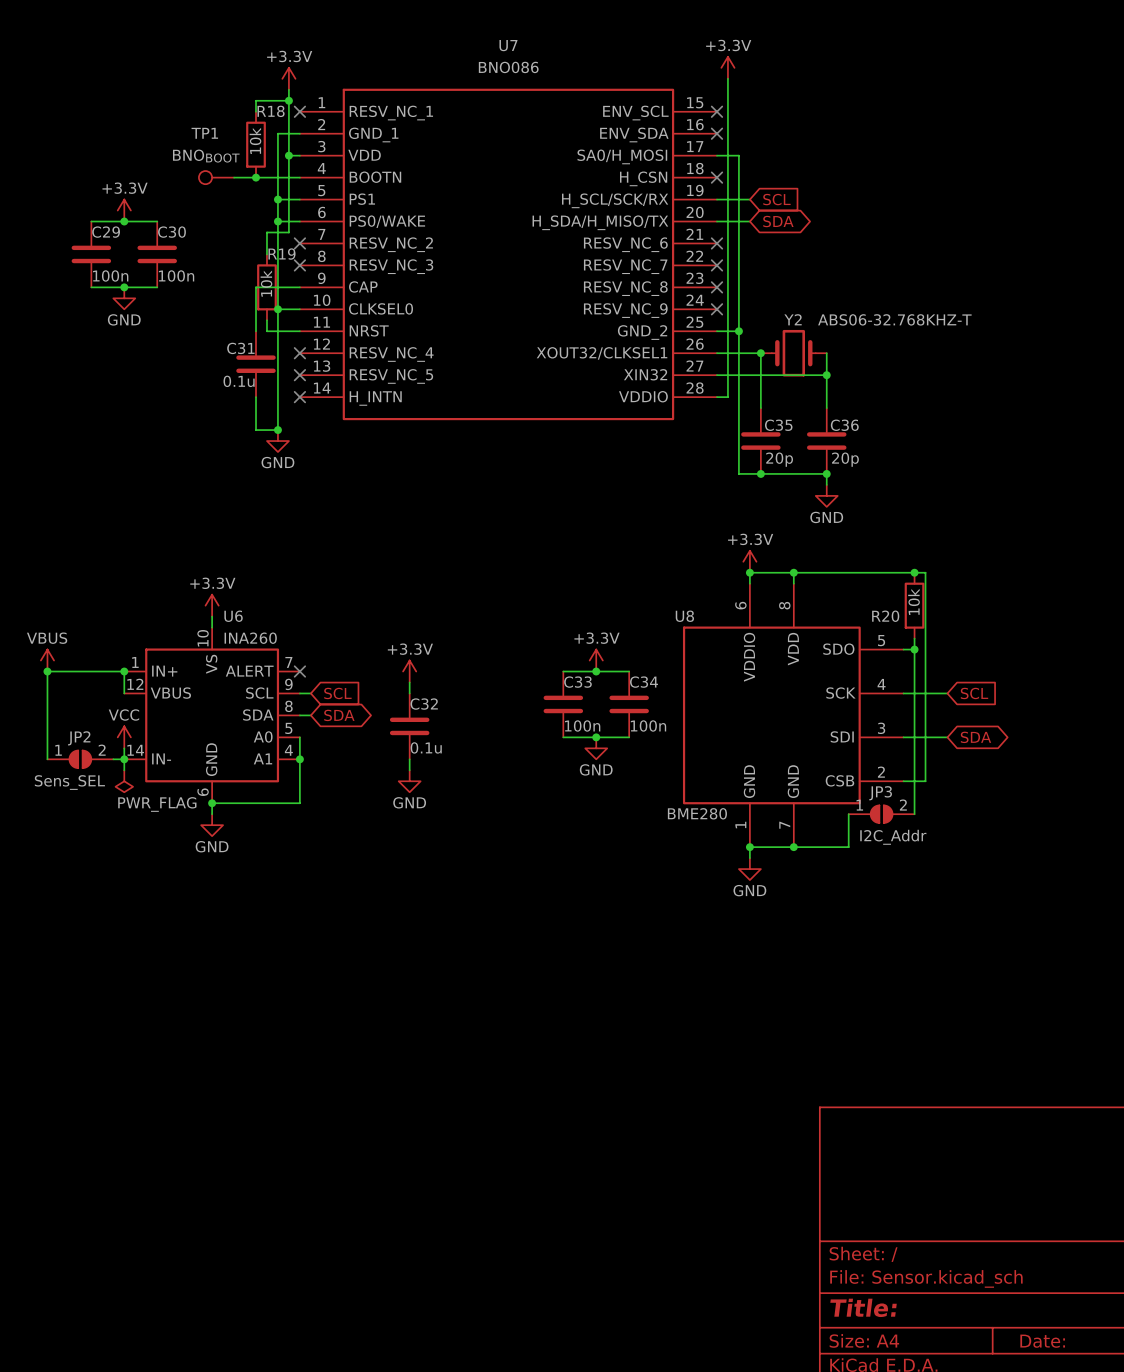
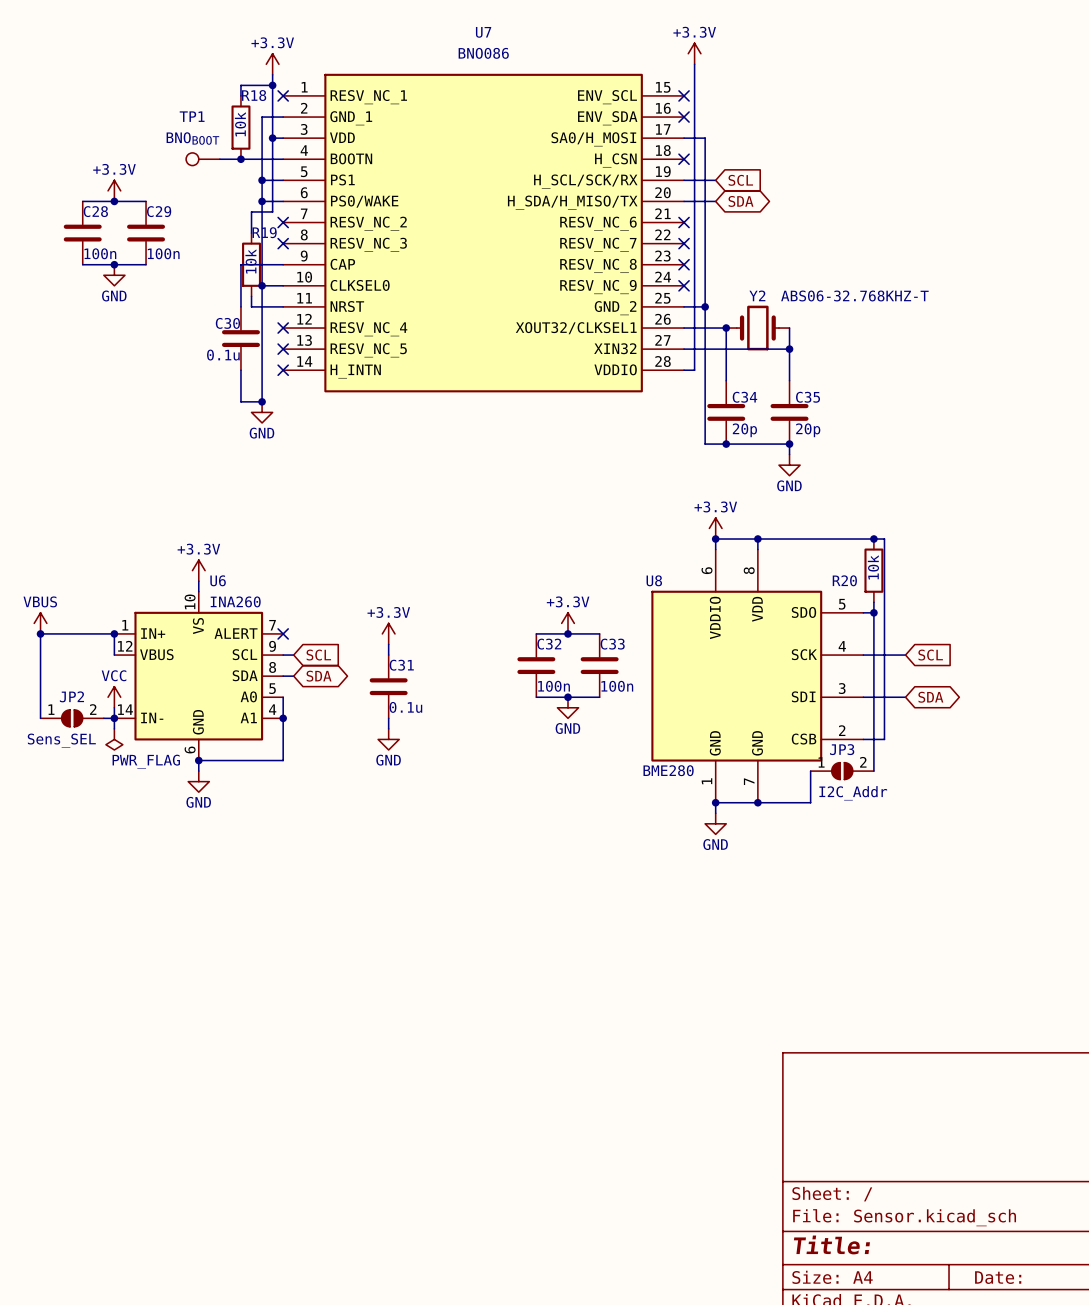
C29 name: C29 (106, 232) -> C28 (95, 211)
C30 name: C30 (171, 232) -> C29 (159, 211)
C31 name: C31 (240, 348) -> C30 (227, 323)
C35 name: C35 (778, 425) -> C34 (744, 397)
C36 name: C36 (844, 425) -> C35 (808, 397)
C33 name: C33 (577, 682) -> C32 (549, 644)
C34 name: C34 (644, 682) -> C33 (612, 644)
C32 name: C32 (424, 704) -> C31 (401, 665)

